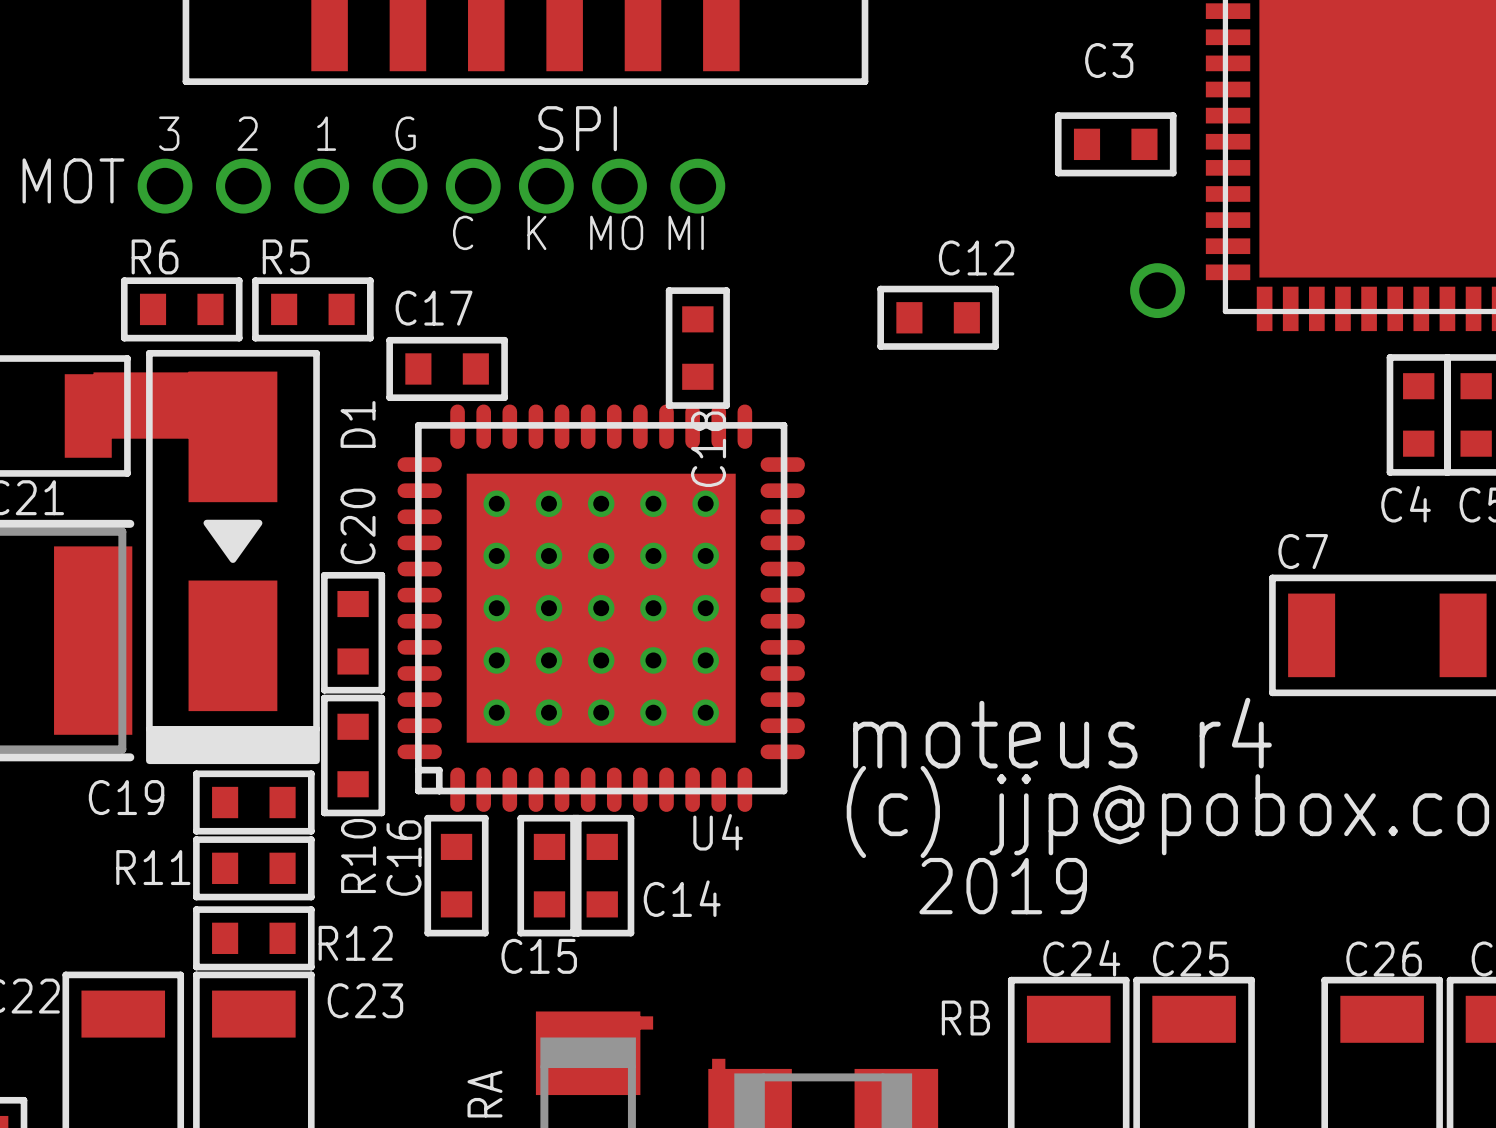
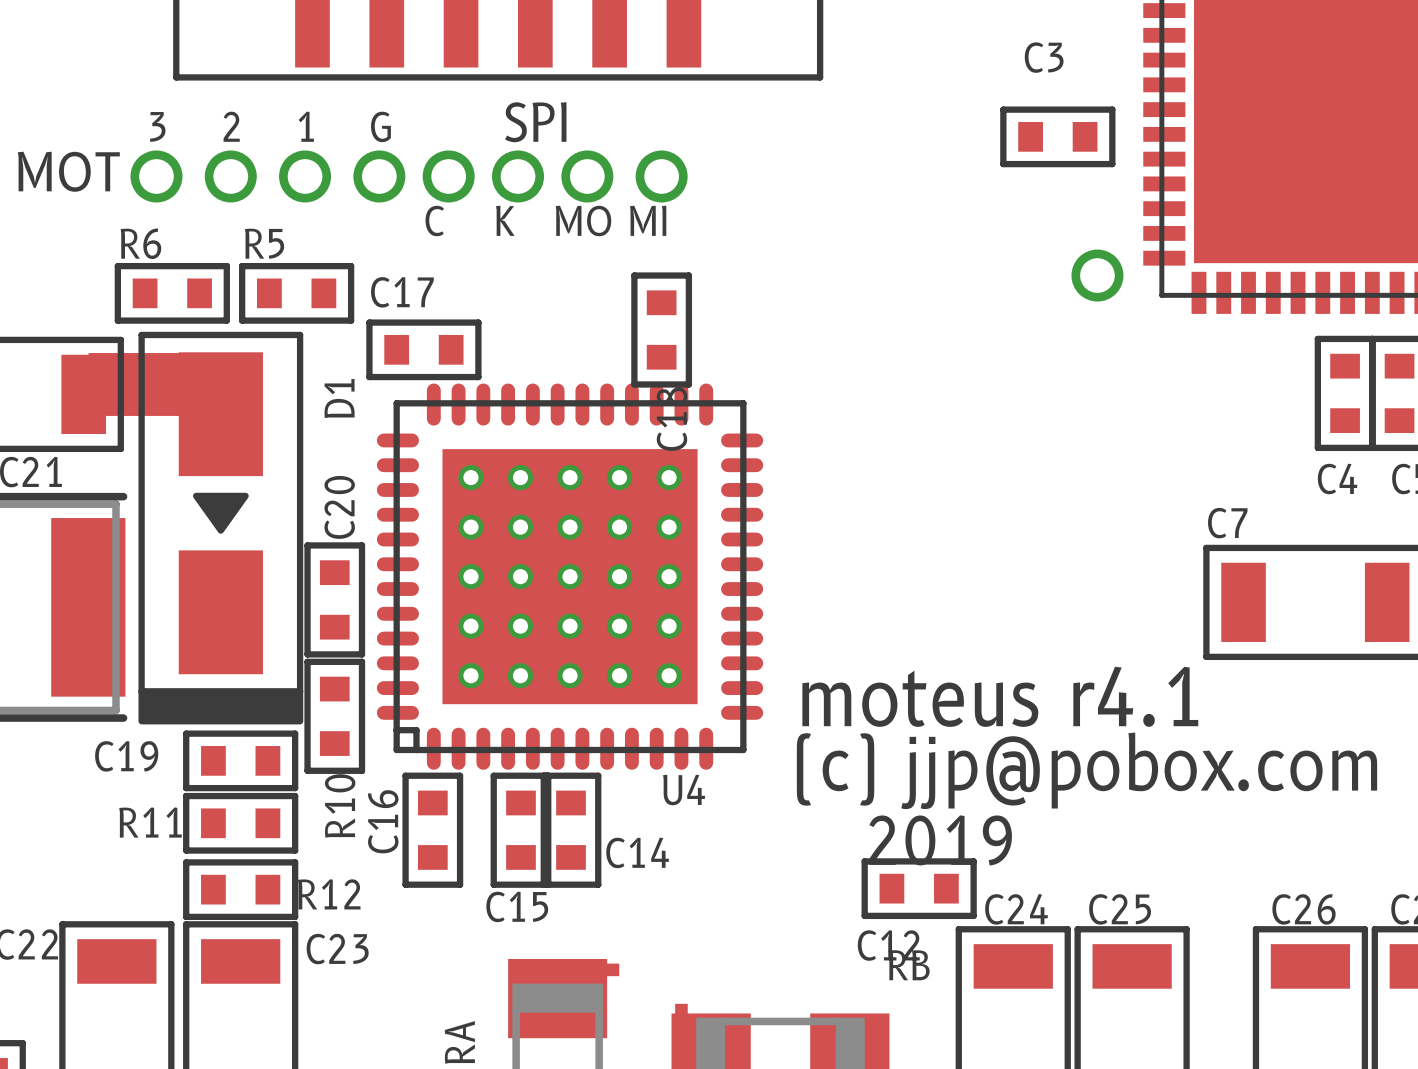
C12 name position: C12 (976, 257) -> C12 (888, 945)
C12 position: (938, 317) -> (919, 888)
text: moteus r4 (1062, 733) -> moteus r4.1 (1000, 696)

